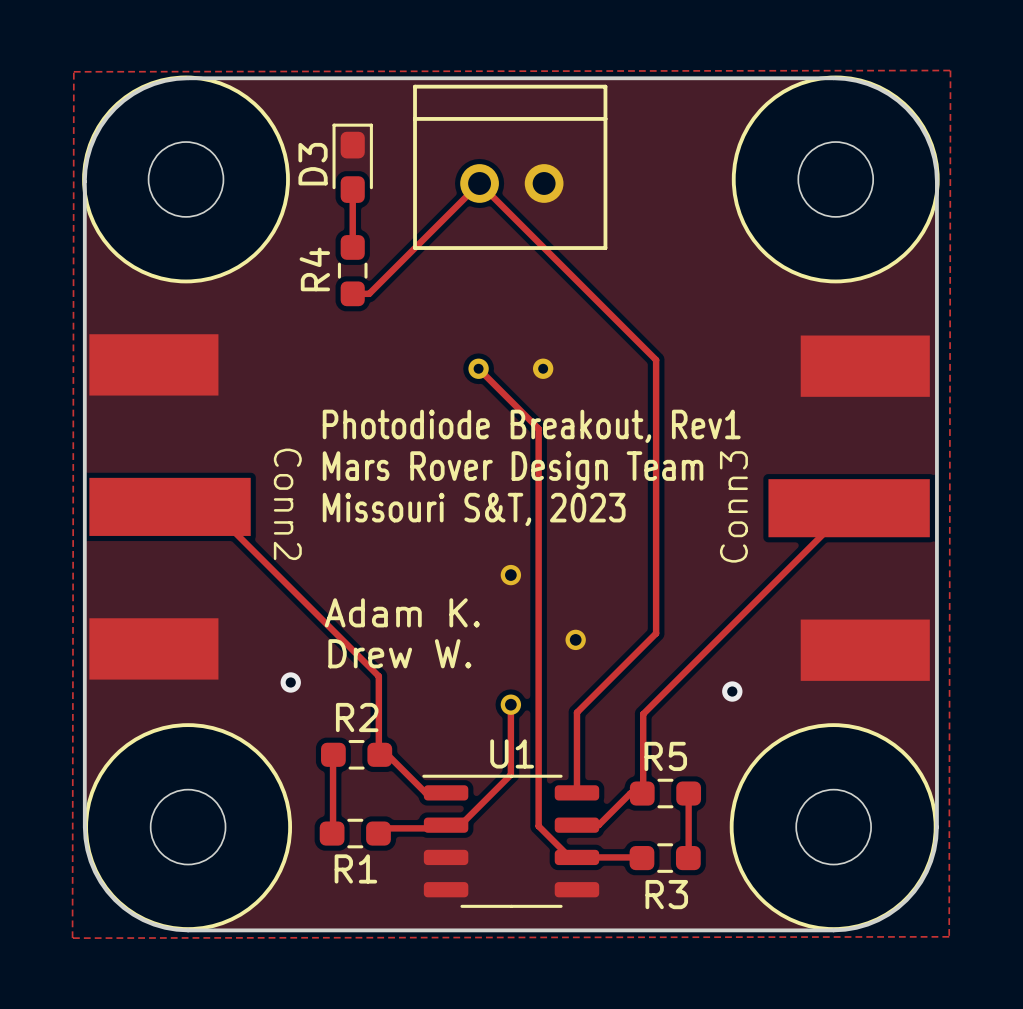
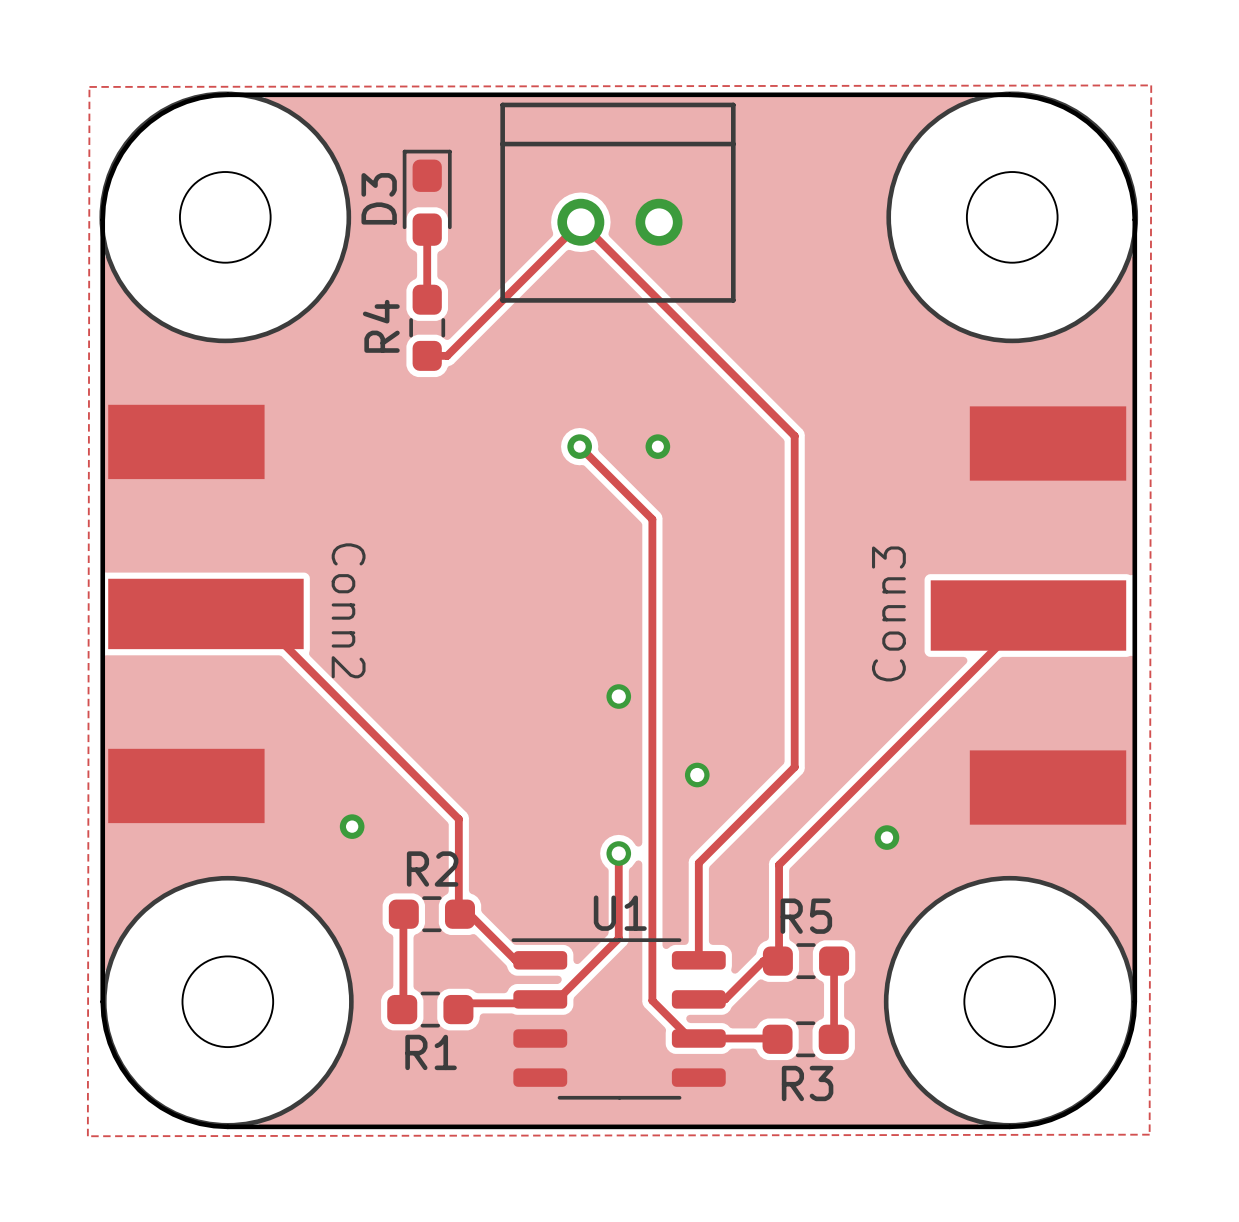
text: Photodiode Breakout, Rev1 (531, 426) -> none
text: Mars Rover Design Team (513, 470) -> none
text: Missouri S&T, 2023 (474, 509) -> none
text: Adam K. (402, 612) -> none
text: Drew W. (399, 653) -> none

